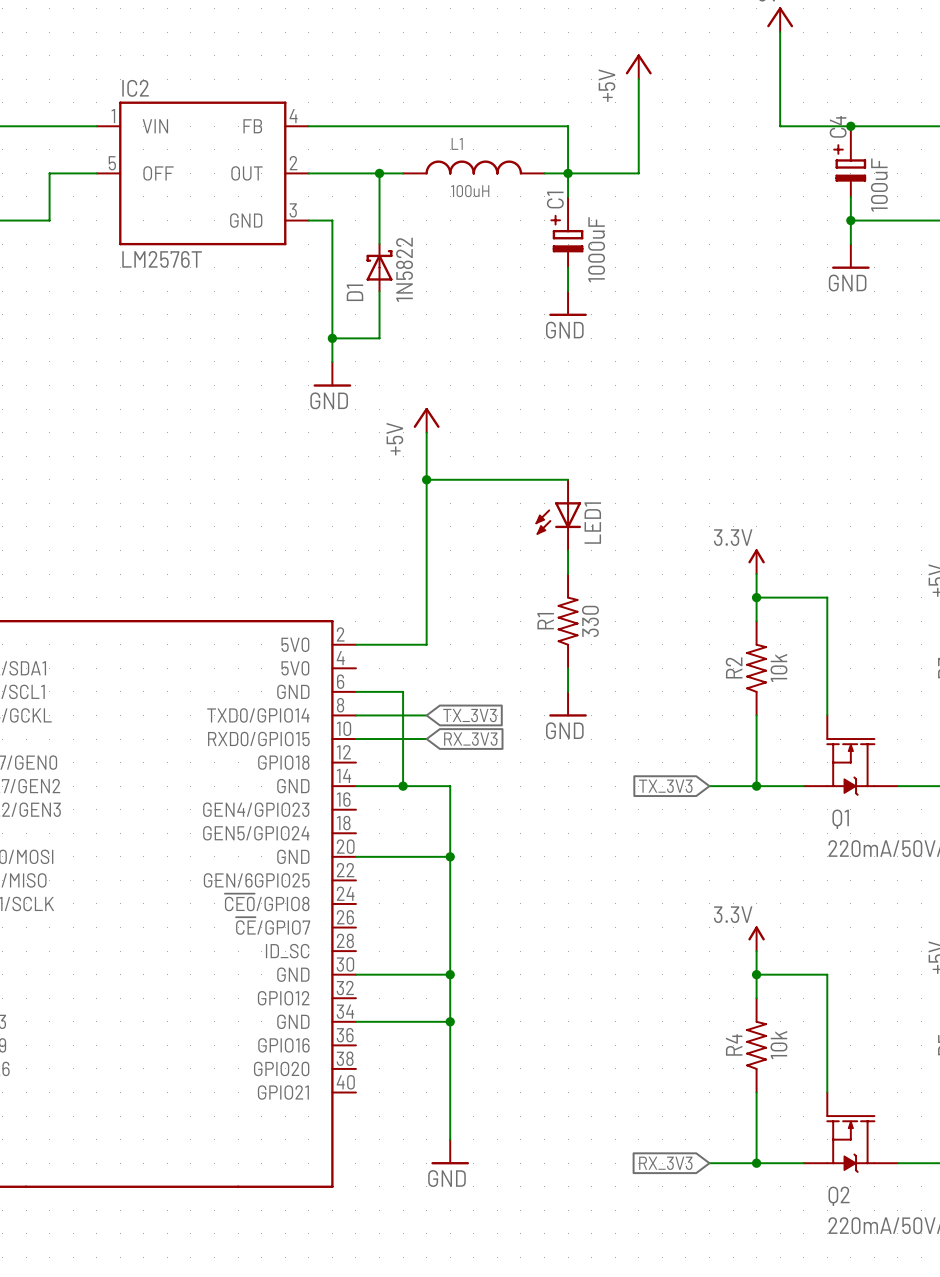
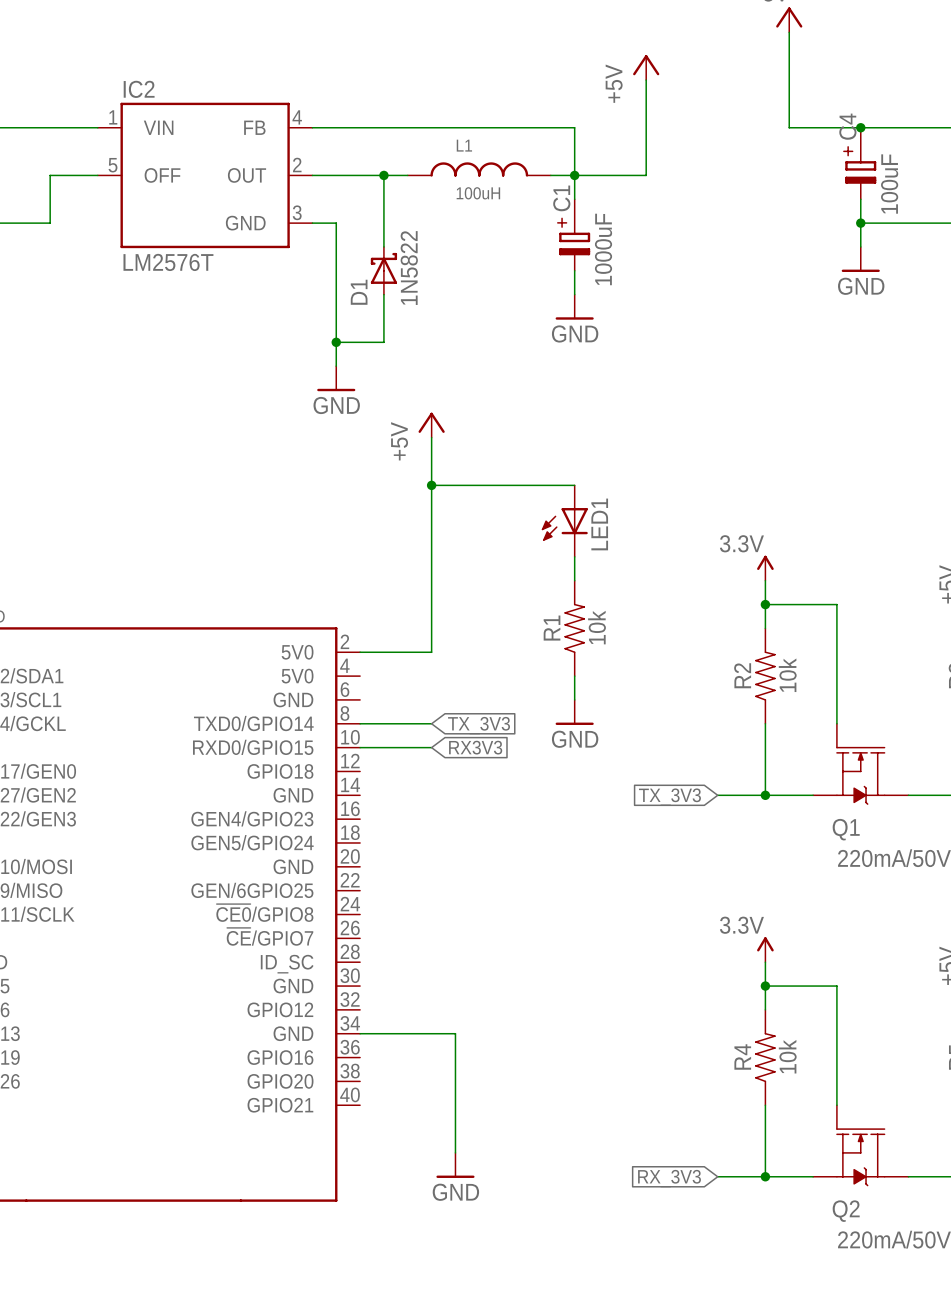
R1 value: 330 (590, 621) -> 10k (596, 627)
wire: (355, 691) (403, 691) (403, 786) -> none
global label: RX_3V3 (470, 739) -> RX3V3 (475, 747)
wire: (355, 786) (450, 786) (450, 1021) -> none
junction: (403, 786) -> none
wire: (355, 856) (450, 856) -> none
junction: (450, 856) -> none
wire: (355, 974) (450, 974) -> none
junction: (450, 974) -> none
junction: (450, 1021) -> none

